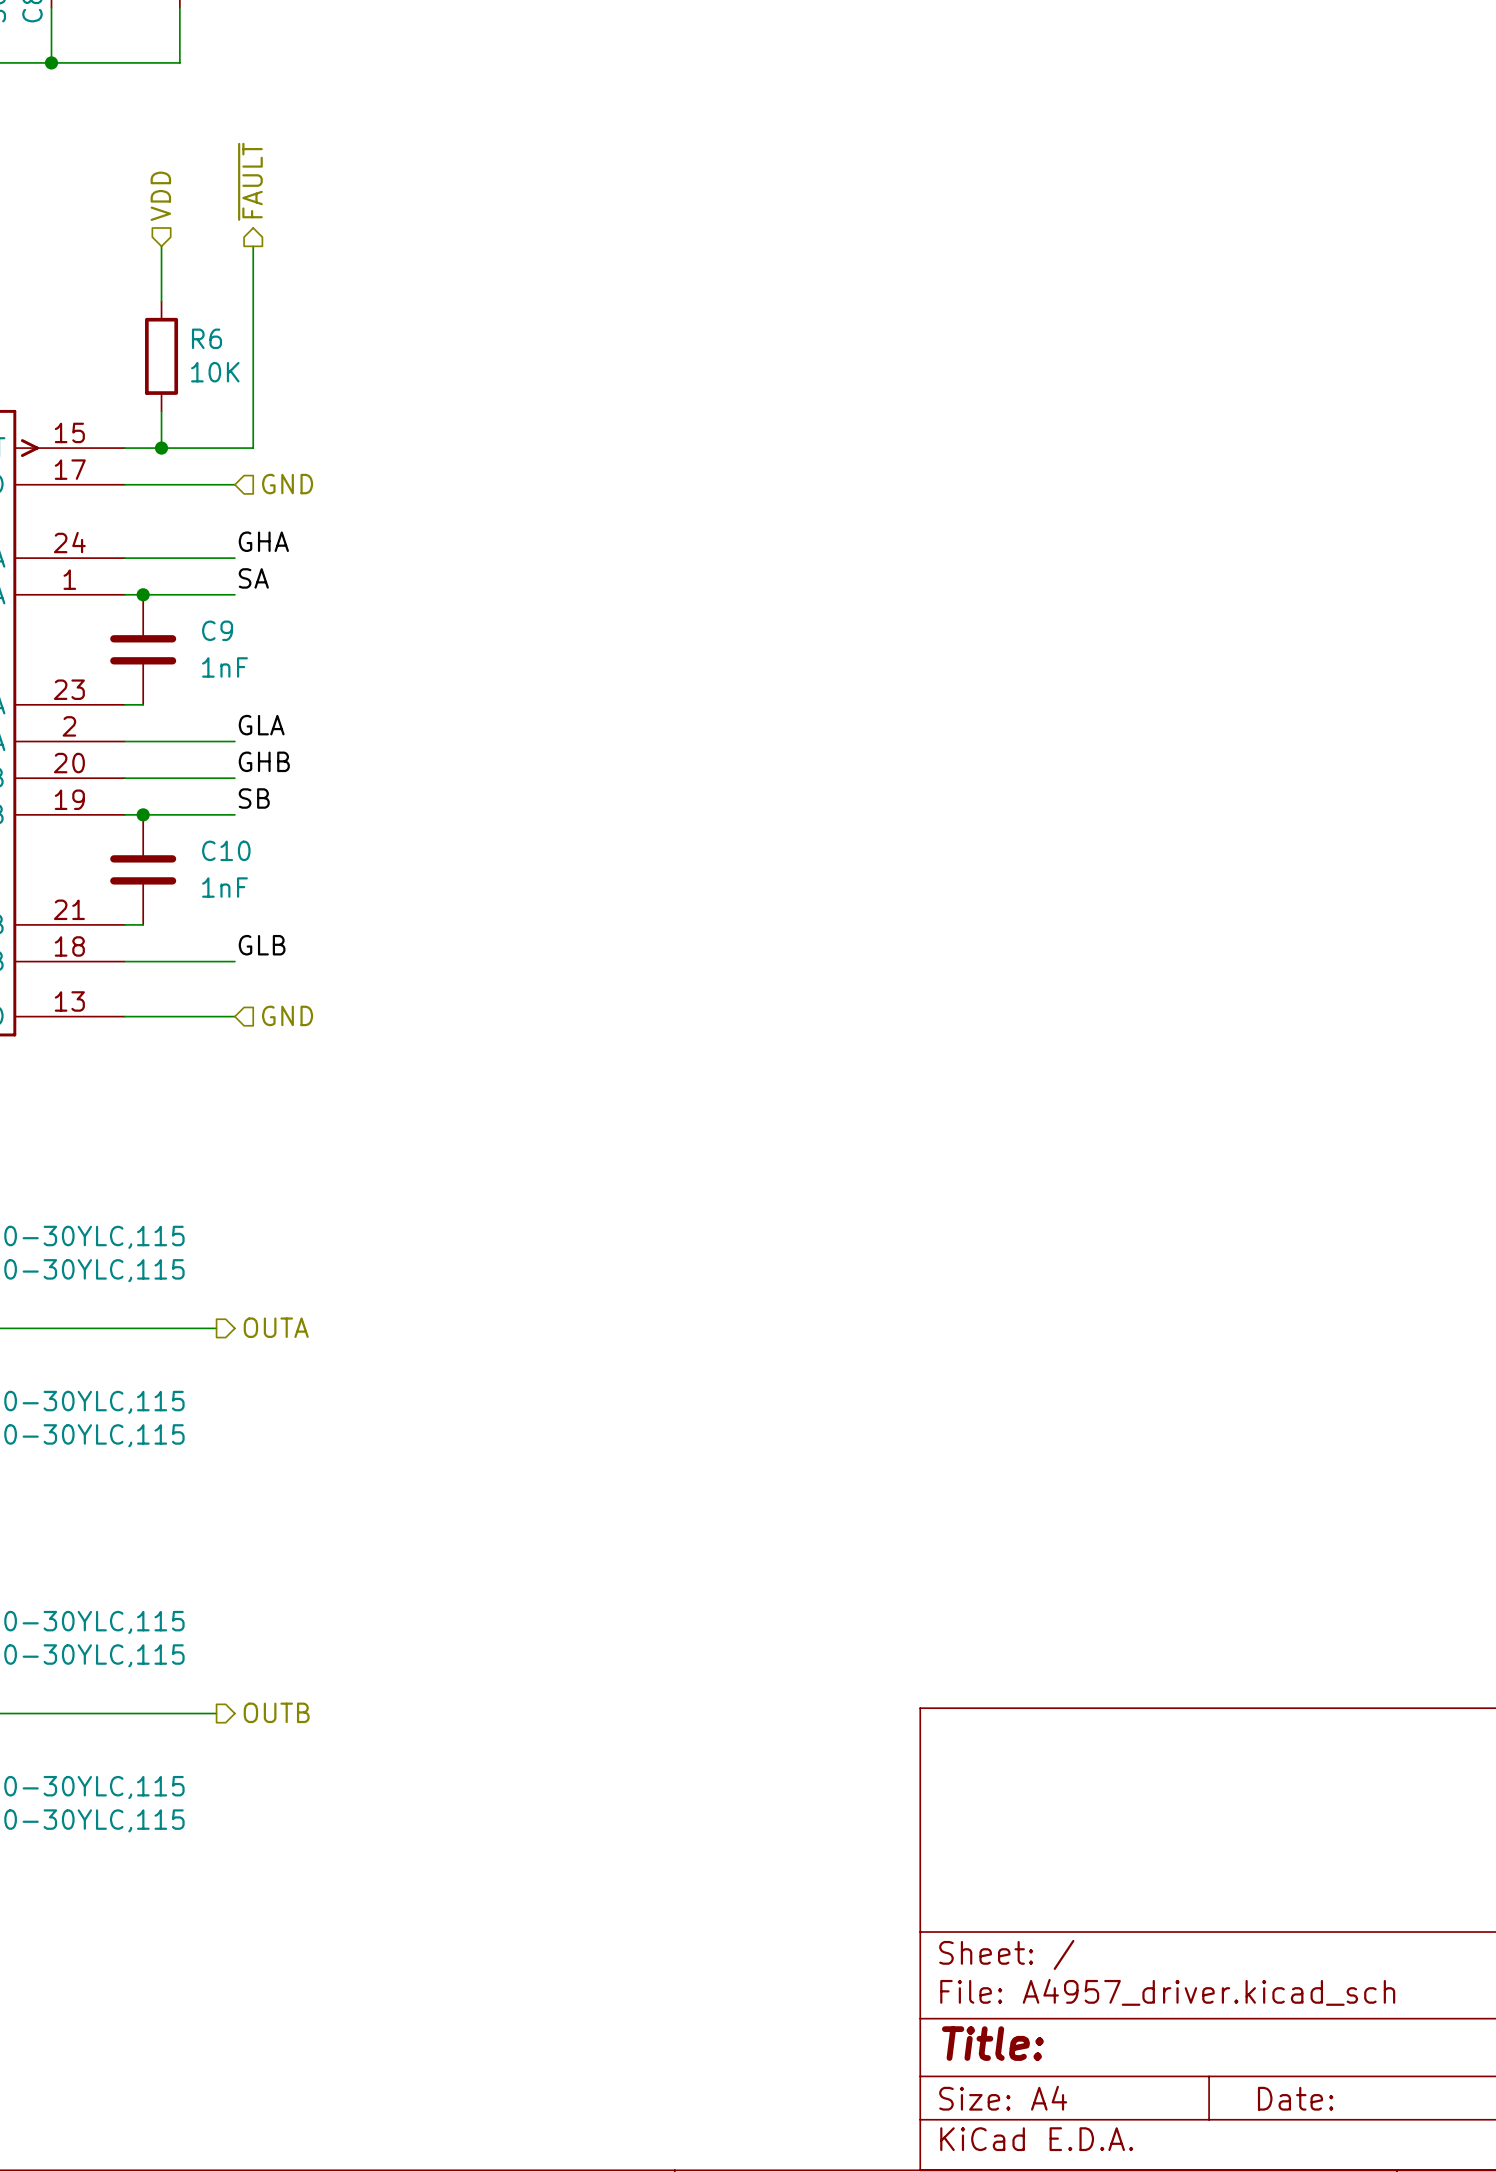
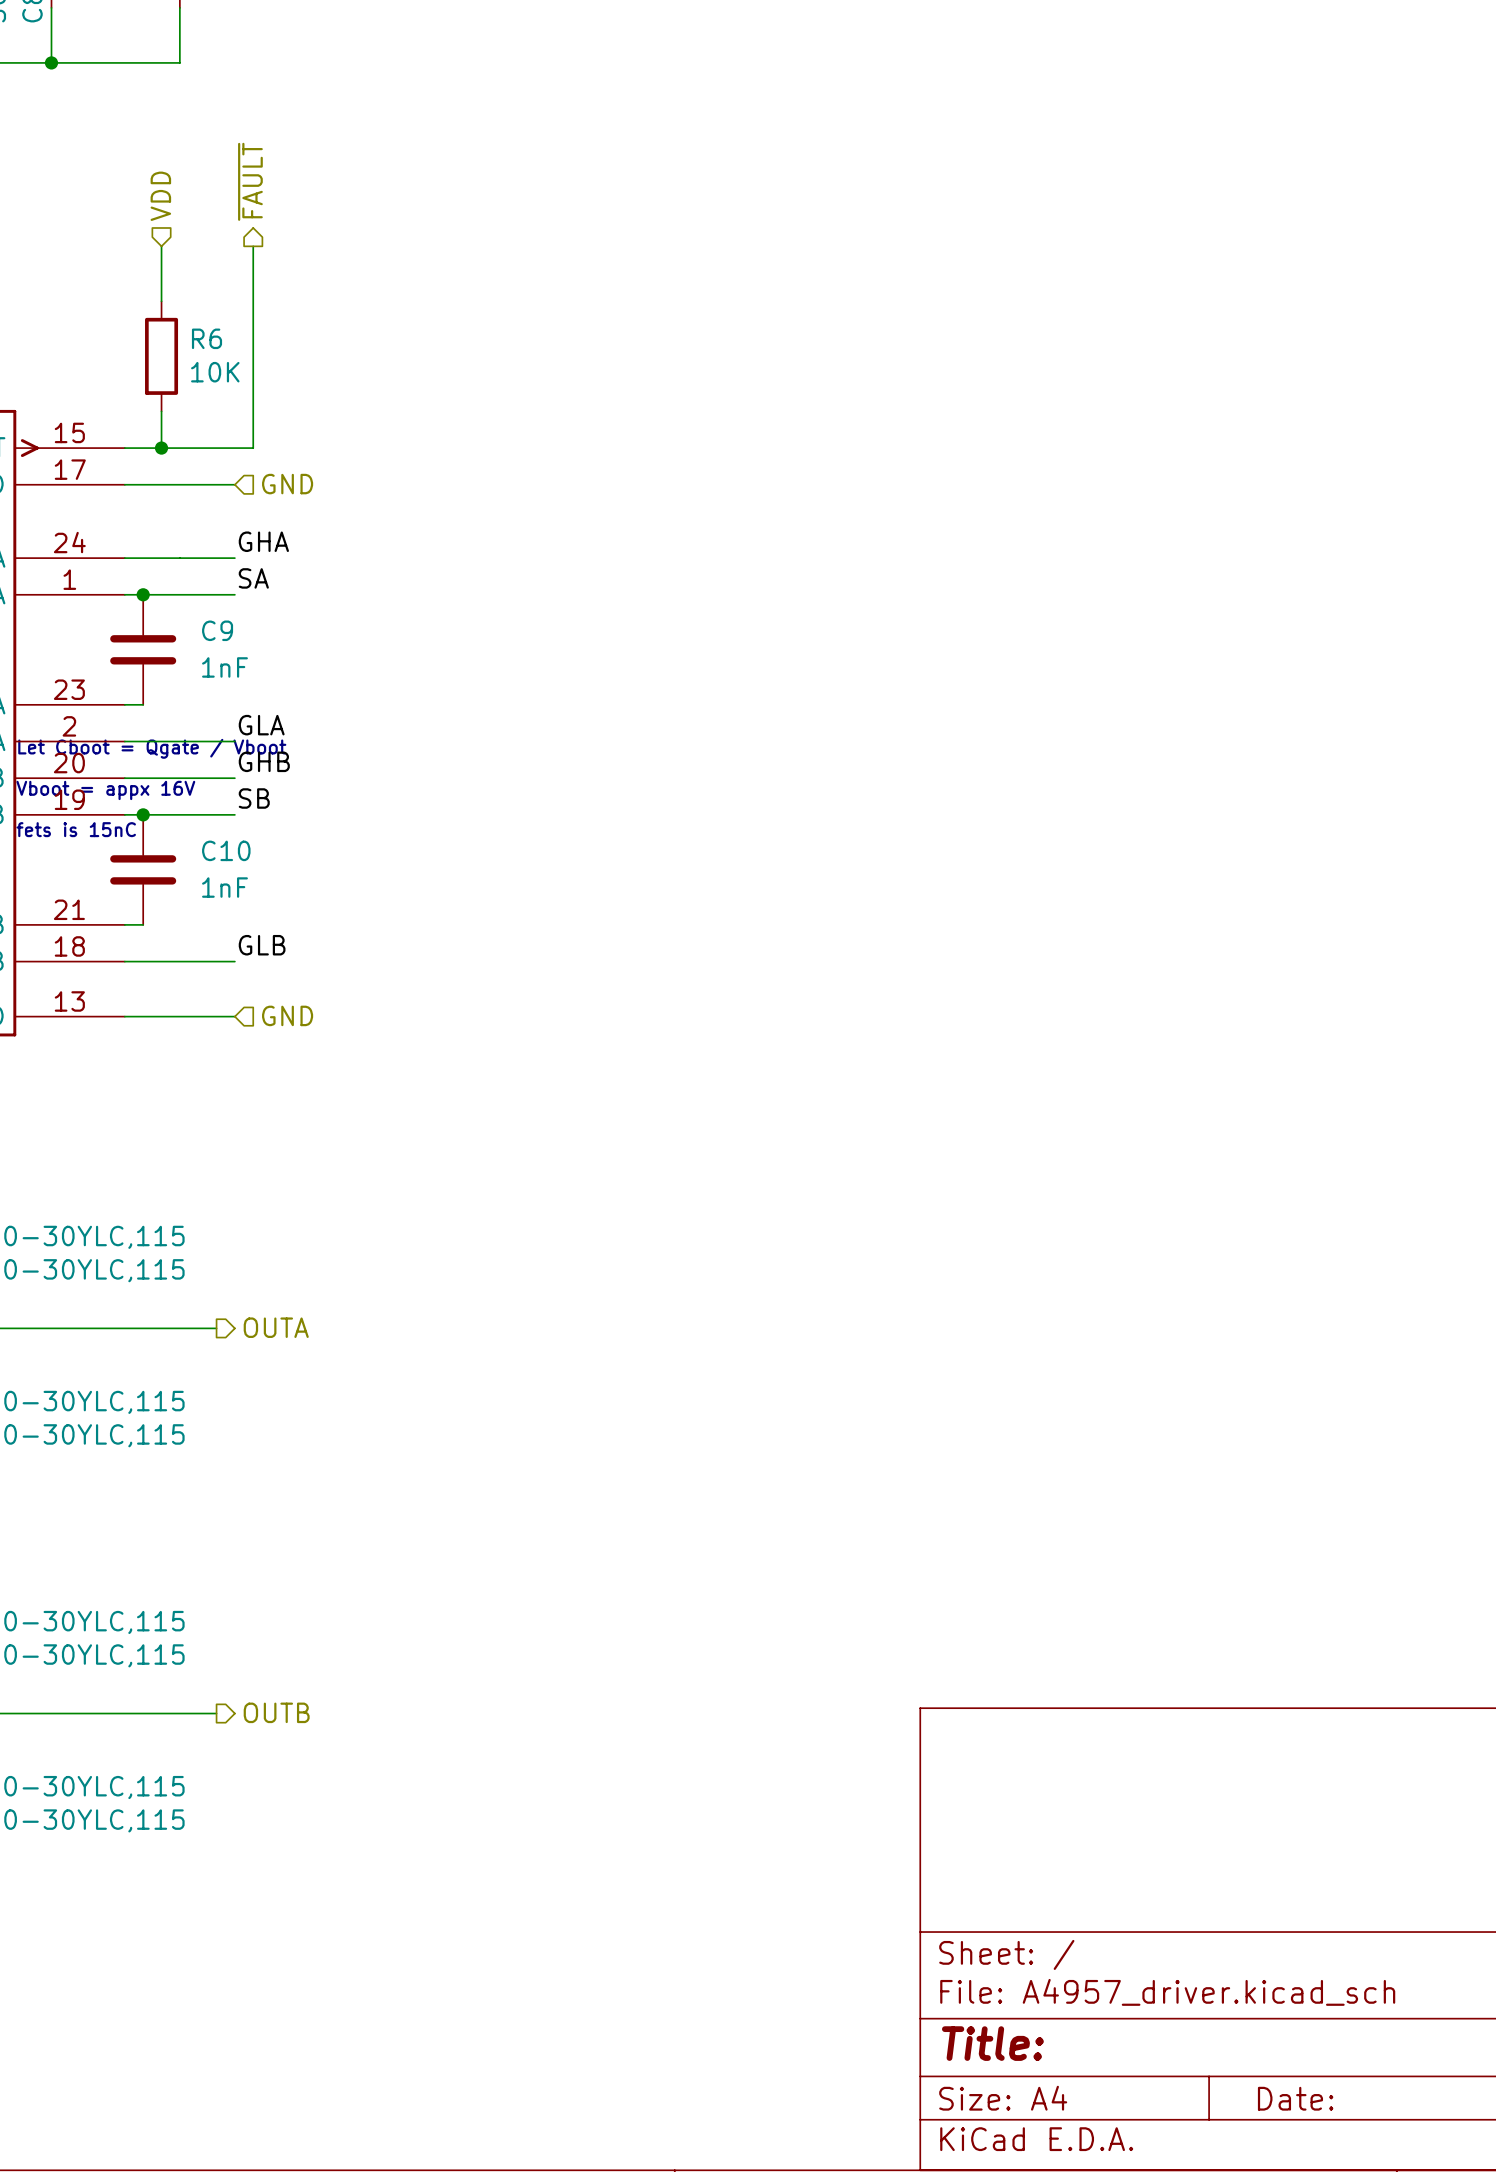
text: none -> Let Cboot = Qgate / Vboot (152, 748)
text: none -> Vboot = appx 16V (105, 790)
text: none -> fets is 15nC (76, 829)

